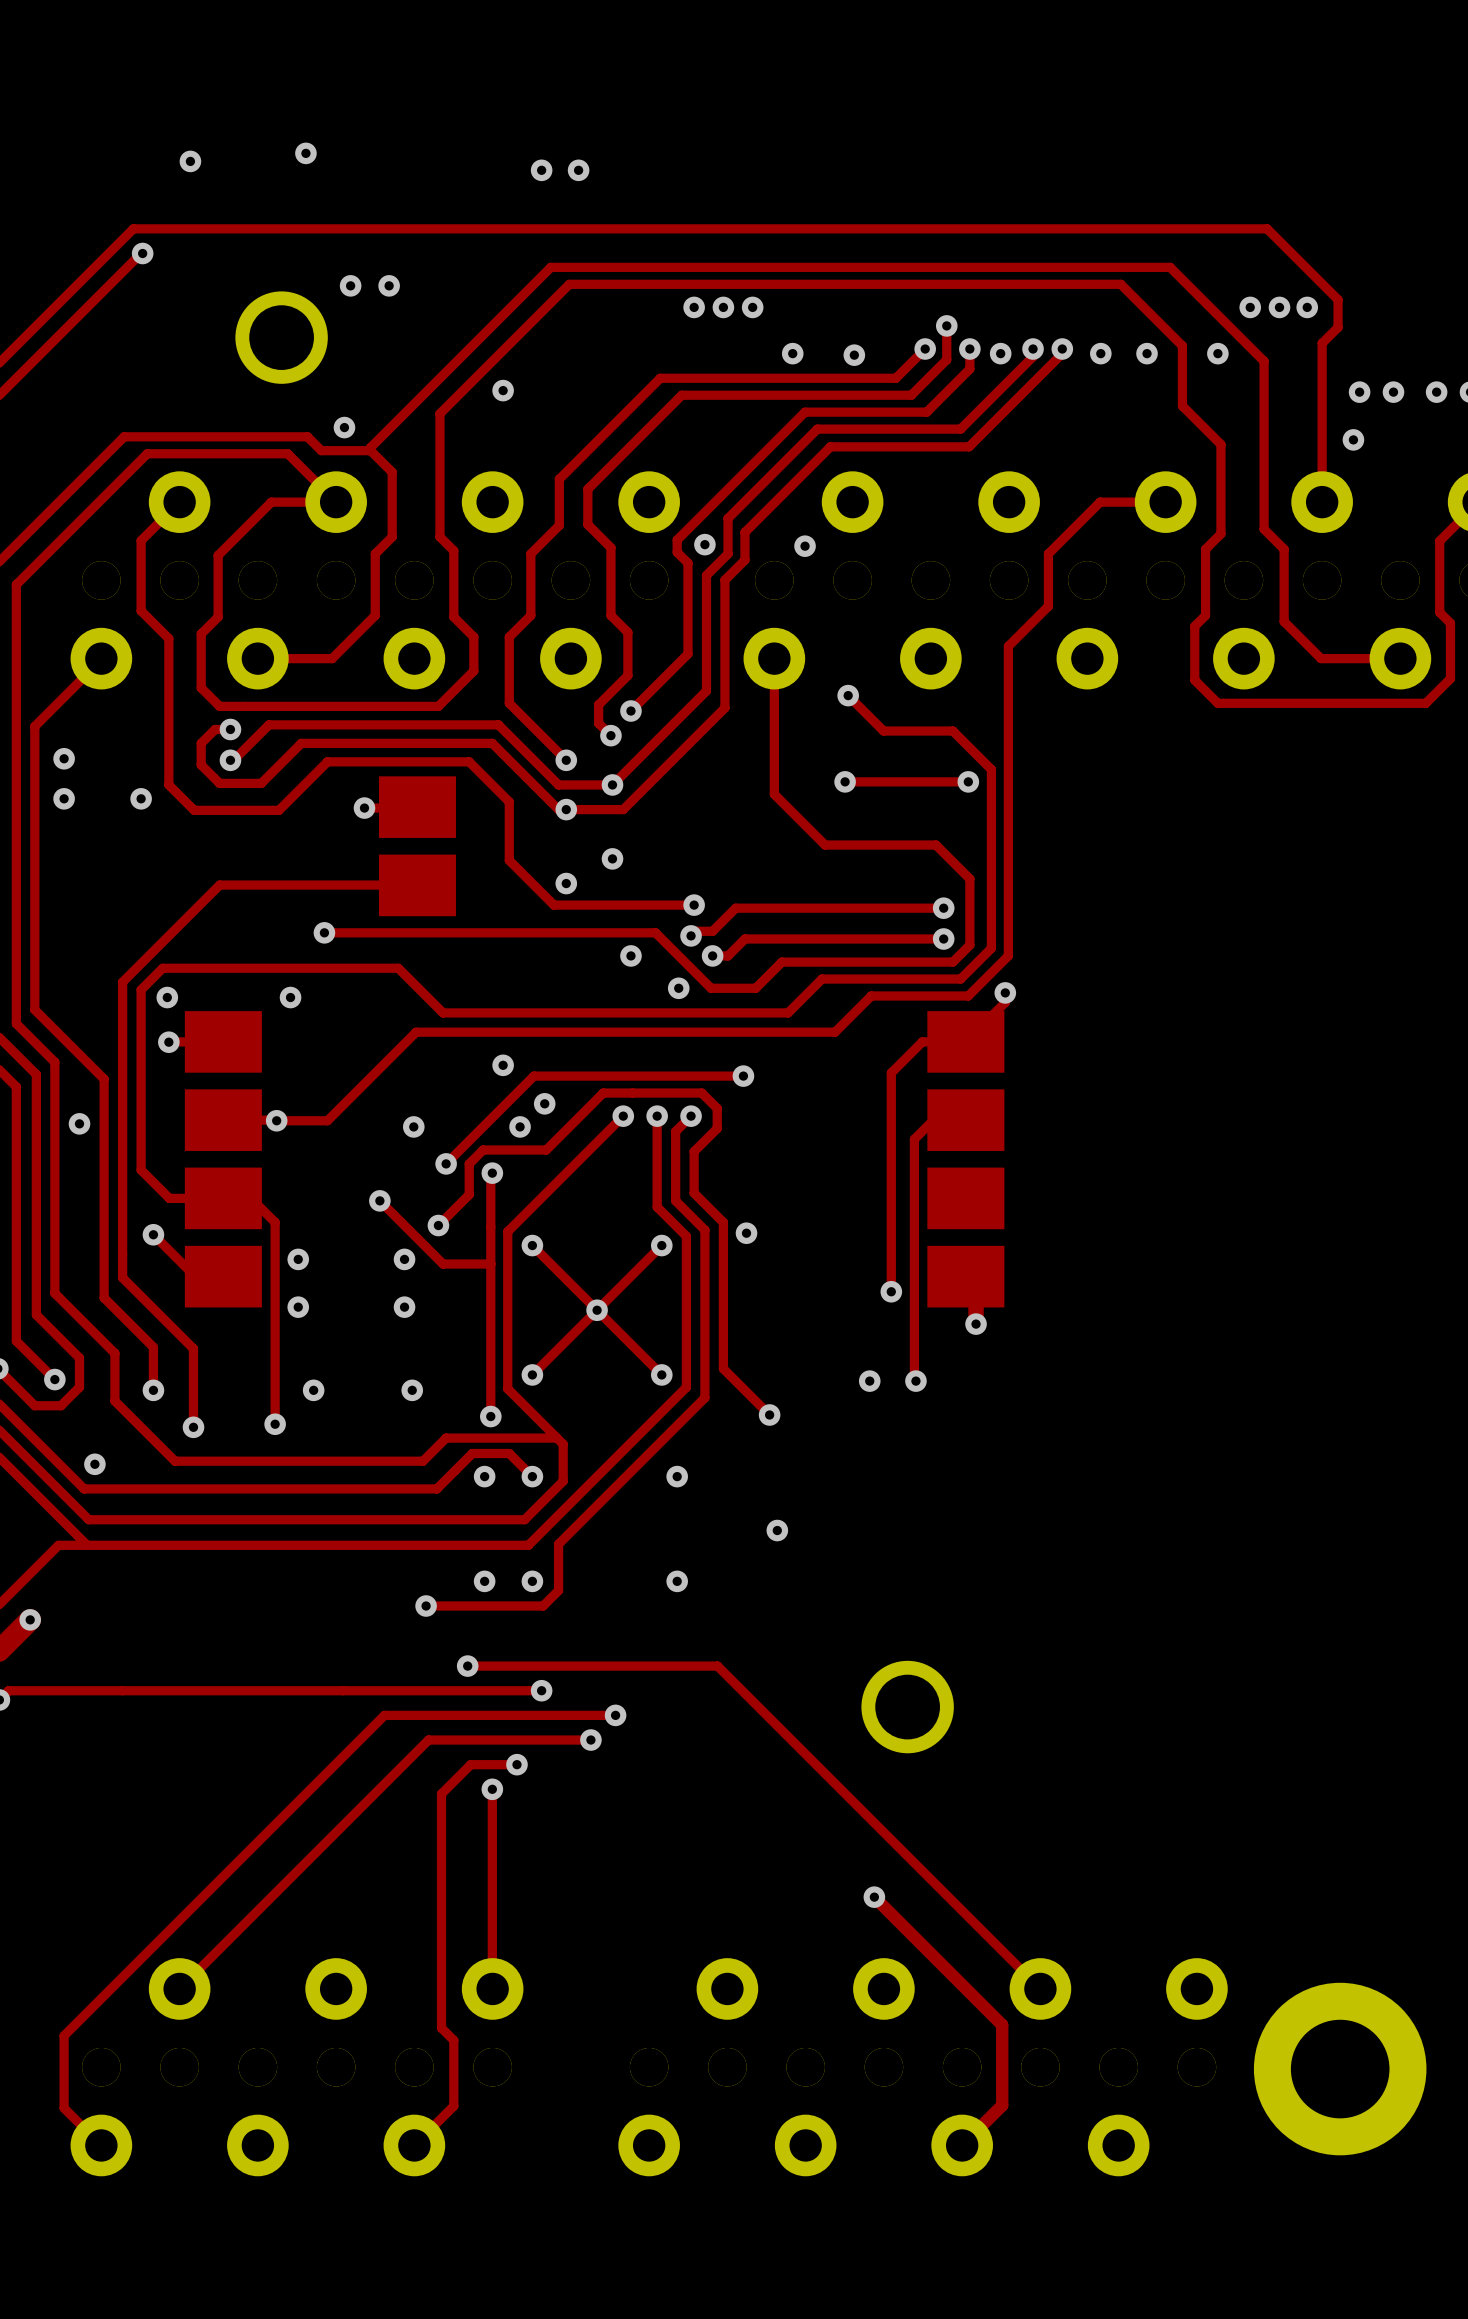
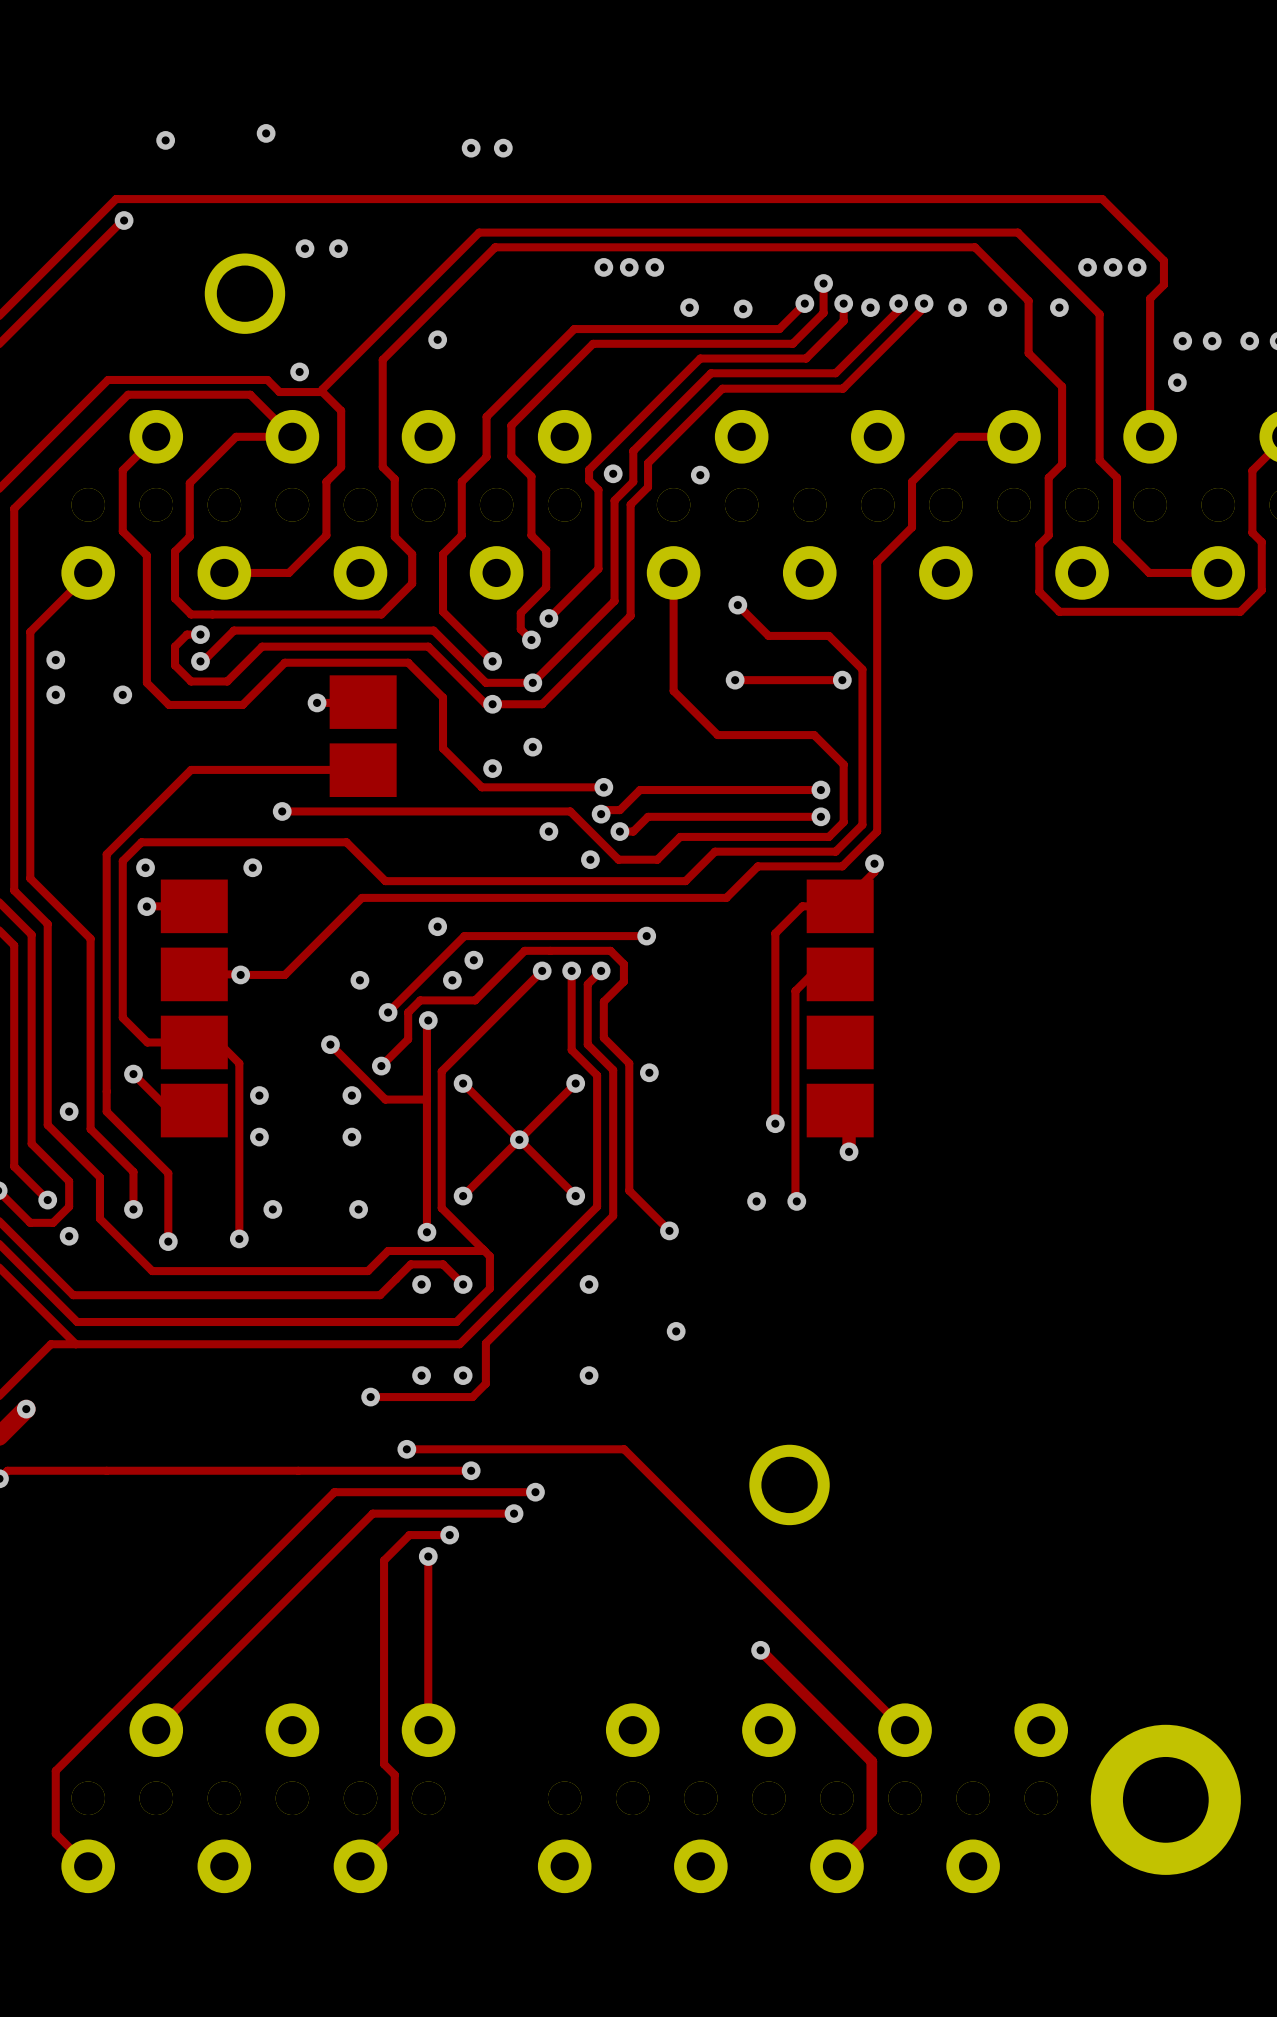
via: (79, 1123) -> none
via: none -> (69, 1111)
via position: (94, 1464) -> (69, 1236)

